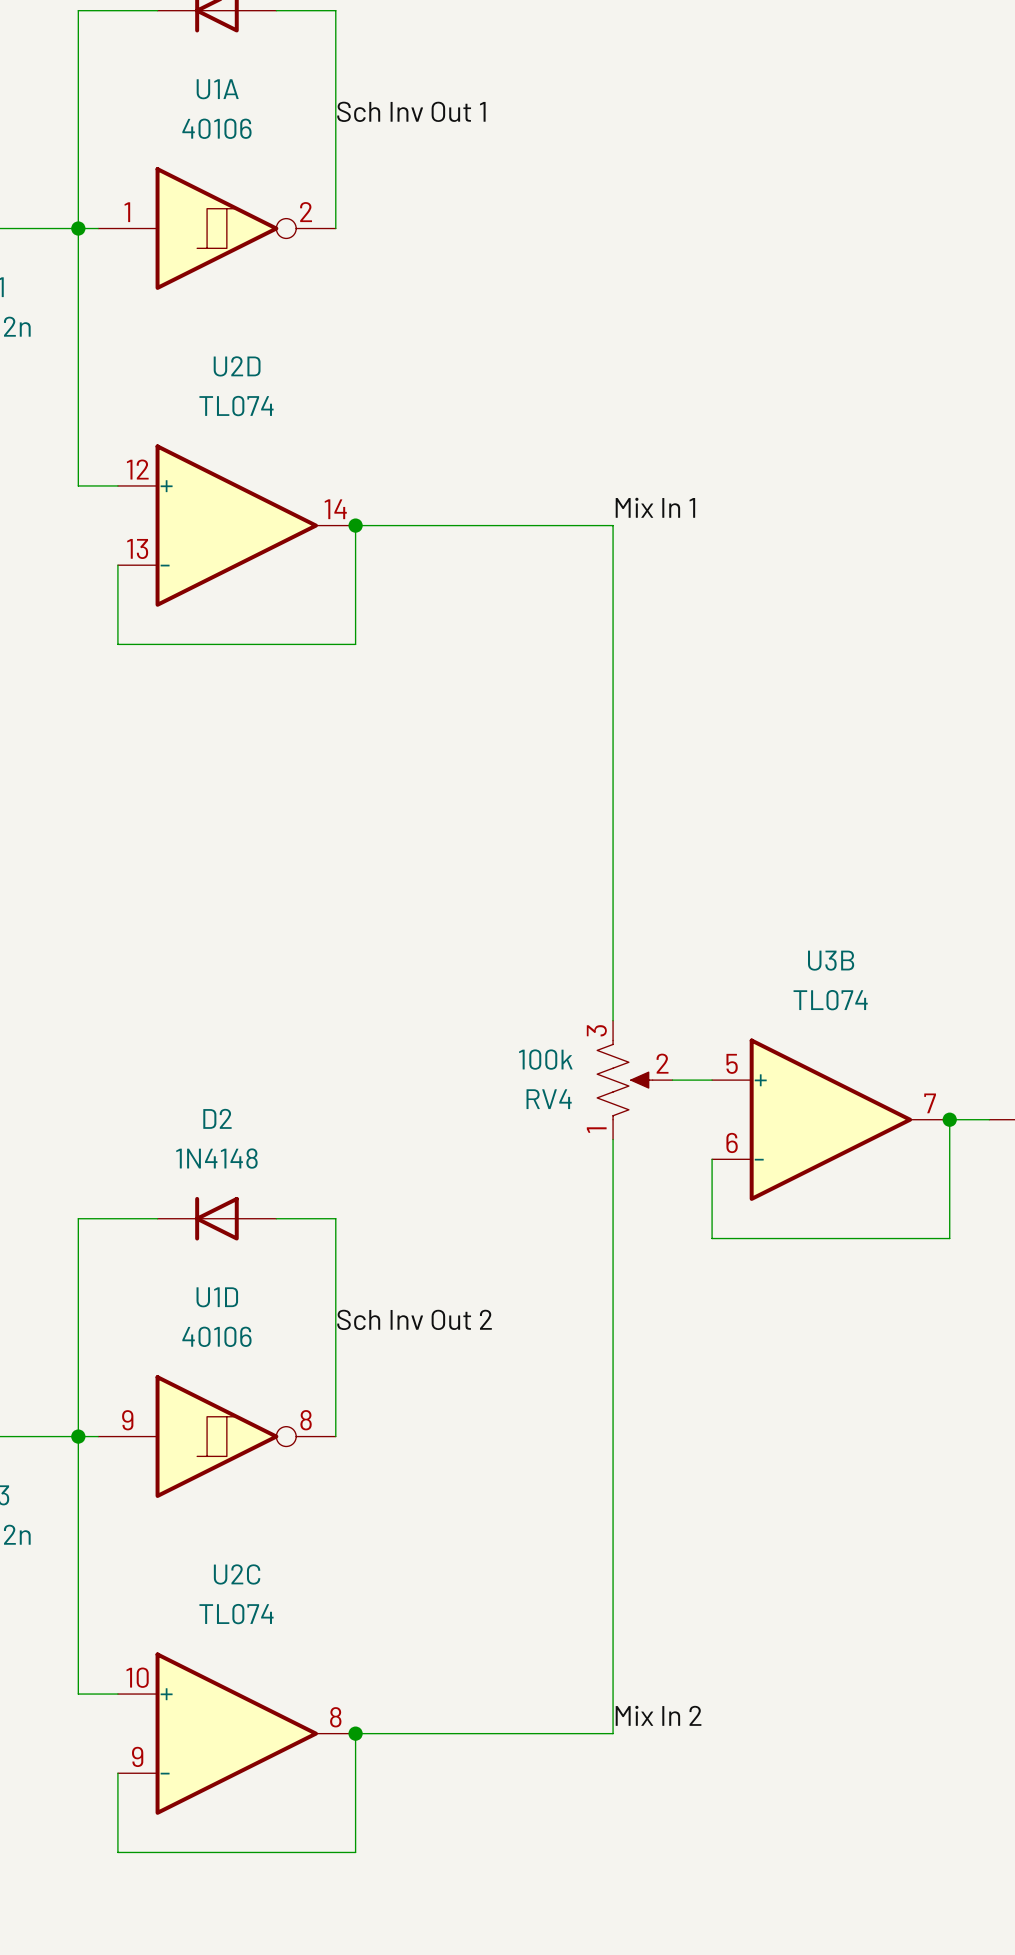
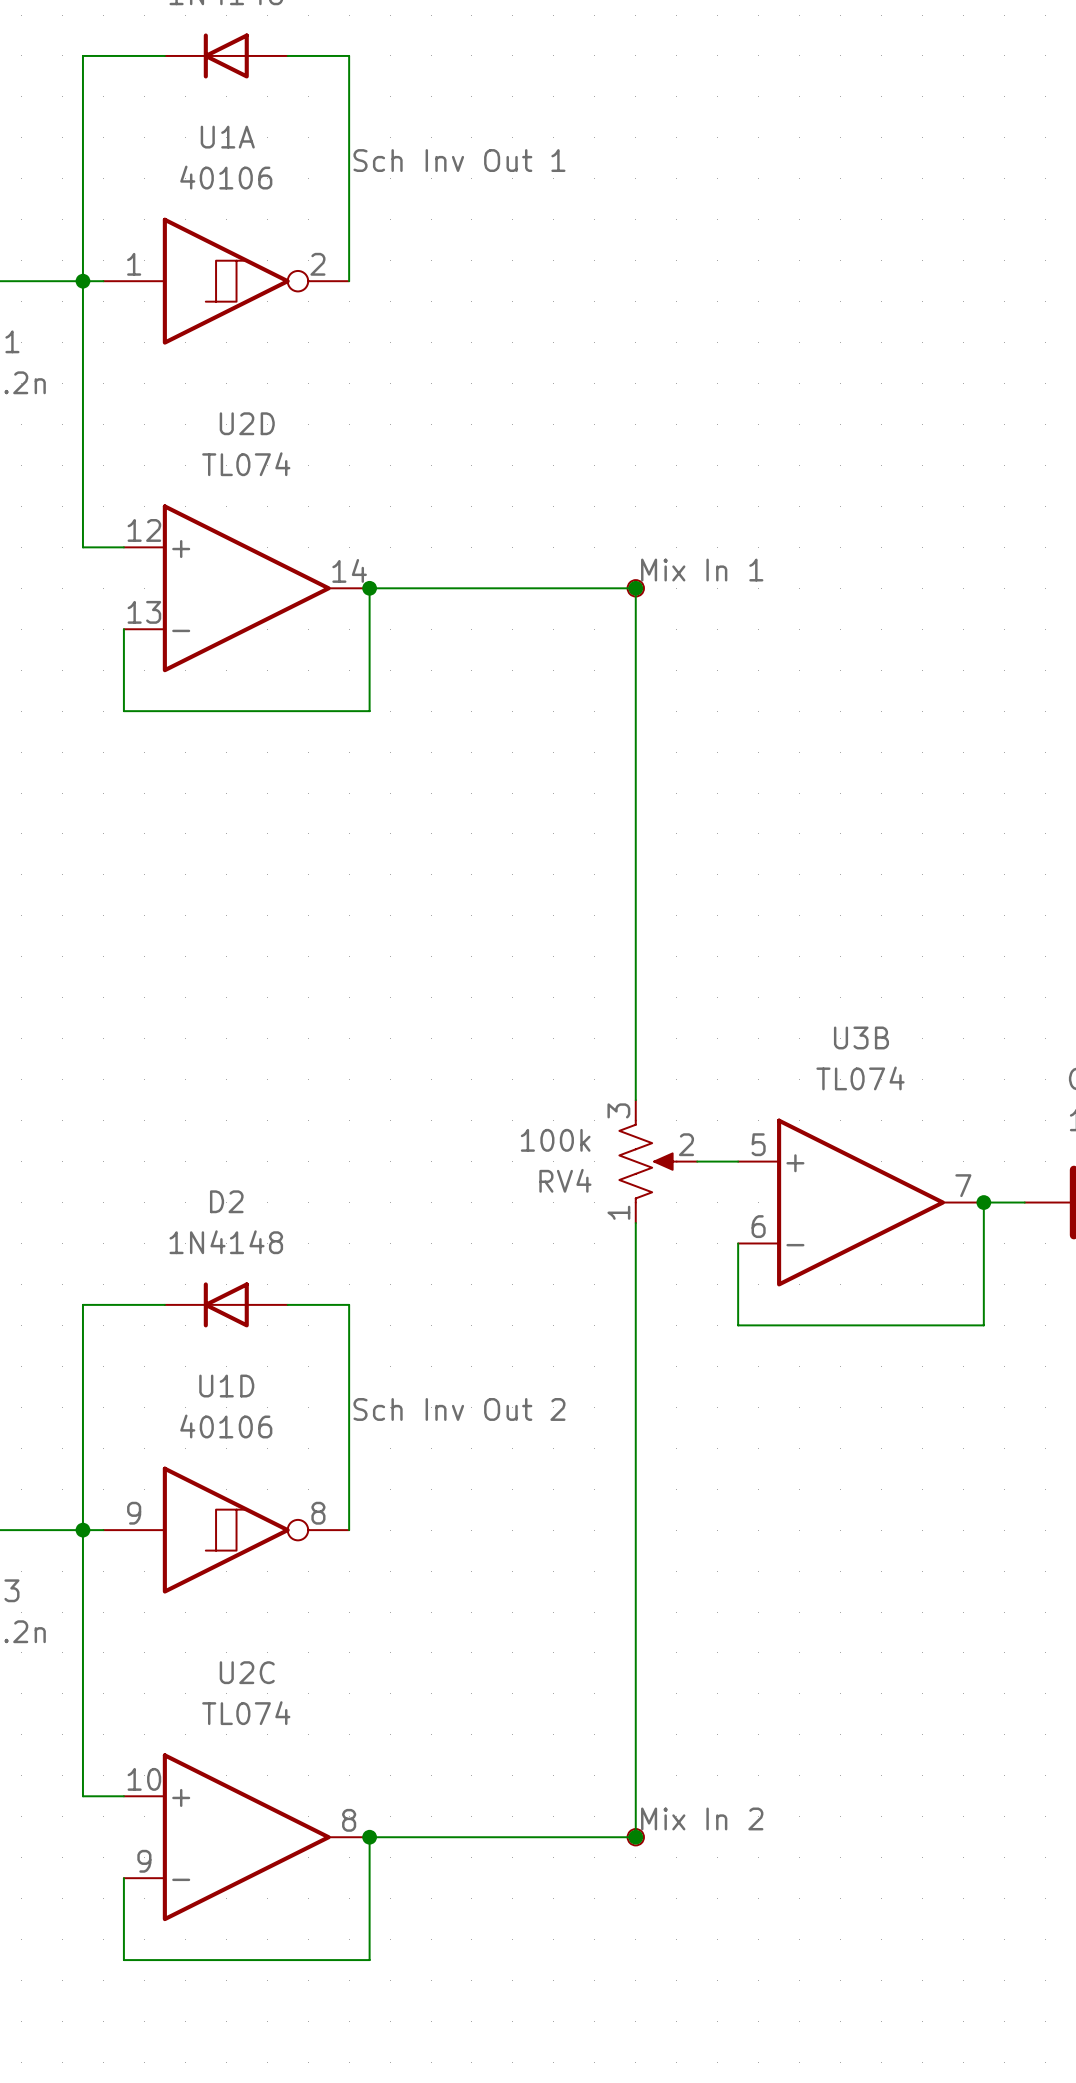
junction: none -> (635, 588)
part: none -> (635, 588)
junction: none -> (635, 1837)
part: none -> (635, 1837)

